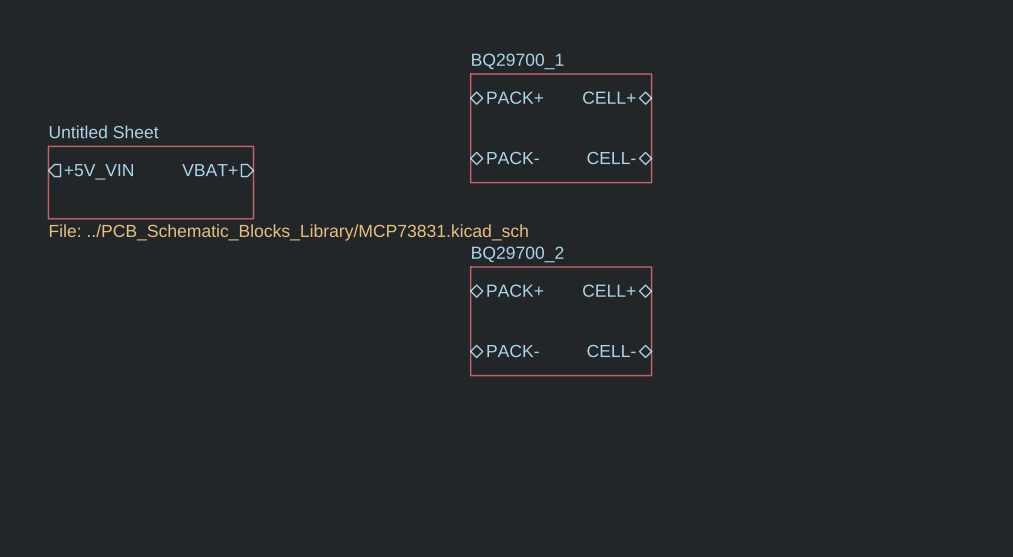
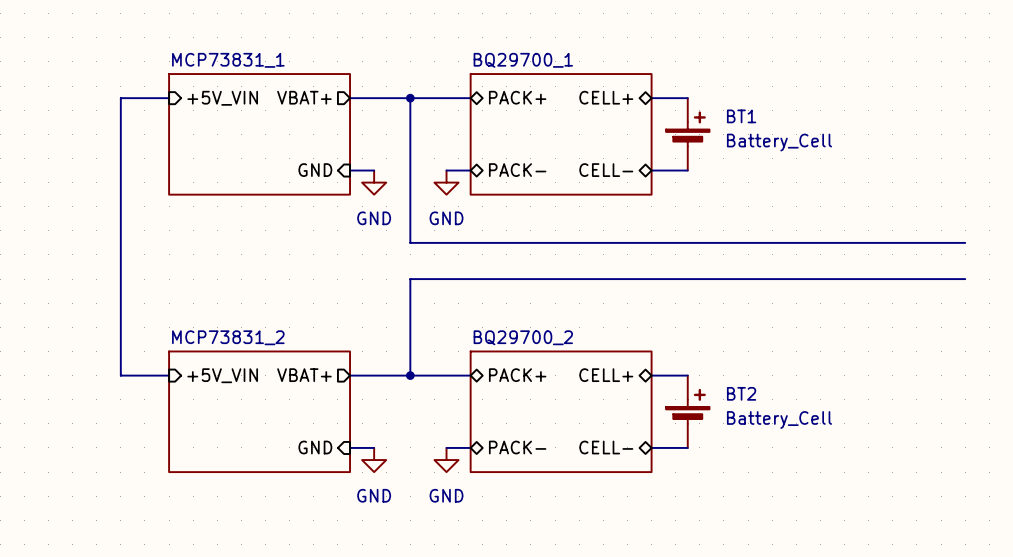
sheet BQ29700_1 shape: [469, 73, 653, 184] -> [469, 73, 653, 196]
sheet pin: none -> VBAT+ (304, 97)
wire: none -> (169, 98) (120, 98) (120, 375) (169, 375)
wire: none -> (350, 98) (470, 98)
wire: none -> (410, 98) (410, 242) (965, 242)
junction: none -> (410, 98)
wire: none -> (651, 98) (687, 98)
sheet pin: none -> +5V_VIN (222, 98)
sheet MCP73831_1: none -> (259, 134)
BT1: none -> Battery_Cell (687, 134)
sheet pin position: PACK- (513, 158) -> PACK- (517, 170)
sheet pin position: CELL- (611, 158) -> CELL- (606, 170)
sheet pin: VBAT+ (209, 170) -> none
sheet pin: none -> GND (315, 170)
wire: none -> (350, 170) (374, 170)
wire: none -> (446, 170) (470, 170)
wire: none -> (651, 170) (687, 170)
sheet pin: +5V_VIN (98, 171) -> none
sheet Untitled Sheet: File: ../PCB_Schematic_Blocks_Library/MCP73831.kicad_sch (150, 182) -> none
power symbol: none -> GND (374, 182)
power symbol: none -> GND (446, 182)
sheet BQ29700_2 shape: [469, 266, 653, 377] -> [469, 350, 653, 473]
wire: none -> (965, 279) (410, 279) (410, 375)
sheet pin position: PACK+ (515, 290) -> PACK+ (517, 375)
sheet pin position: CELL+ (609, 290) -> CELL+ (606, 375)
sheet pin: PACK- (513, 351) -> none
sheet pin: CELL- (611, 351) -> none
sheet pin: none -> VBAT+ (304, 375)
wire: none -> (350, 375) (470, 375)
junction: none -> (410, 375)
wire: none -> (651, 375) (687, 375)
sheet pin: none -> +5V_VIN (222, 375)
sheet MCP73831_2: none -> (259, 411)
BT2: none -> Battery_Cell (687, 411)
sheet pin: none -> GND (315, 447)
wire: none -> (350, 447) (374, 447)
wire: none -> (446, 447) (470, 447)
sheet pin: none -> PACK- (517, 447)
sheet pin: none -> CELL- (606, 447)
wire: none -> (651, 447) (687, 447)
power symbol: none -> GND (374, 460)
power symbol: none -> GND (446, 460)

